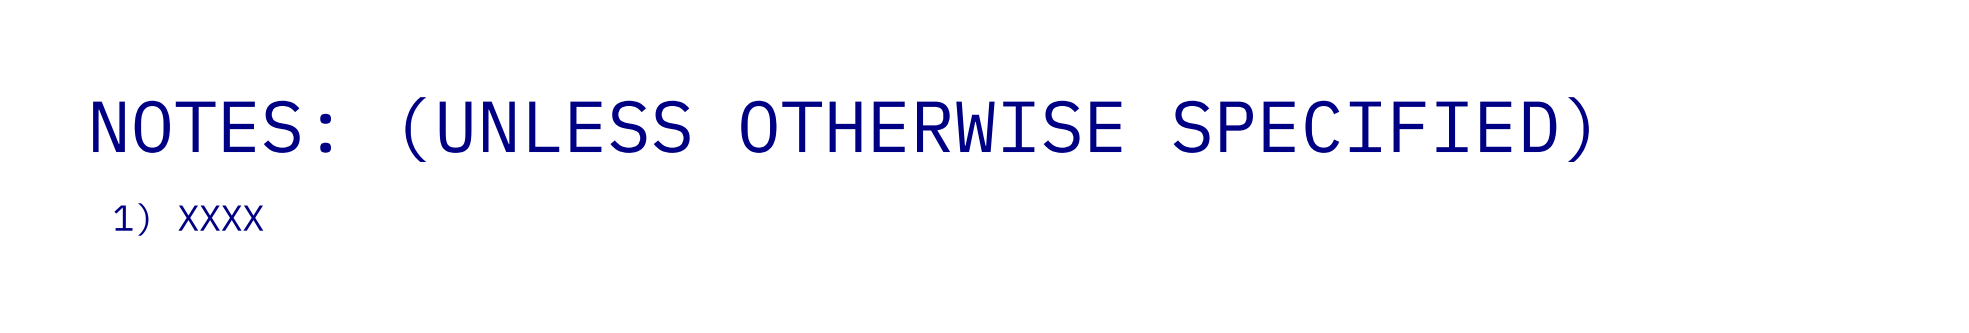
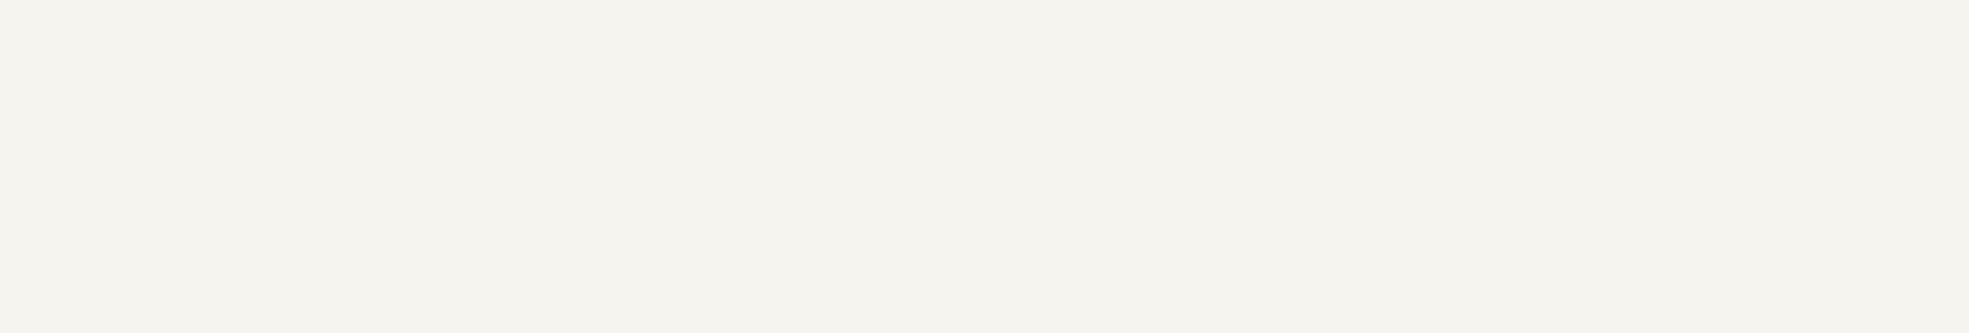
text: NOTES: (UNLESS OTHERWISE SPECIFIED) (840, 129) -> none
text: 1) XXXX (188, 219) -> none

